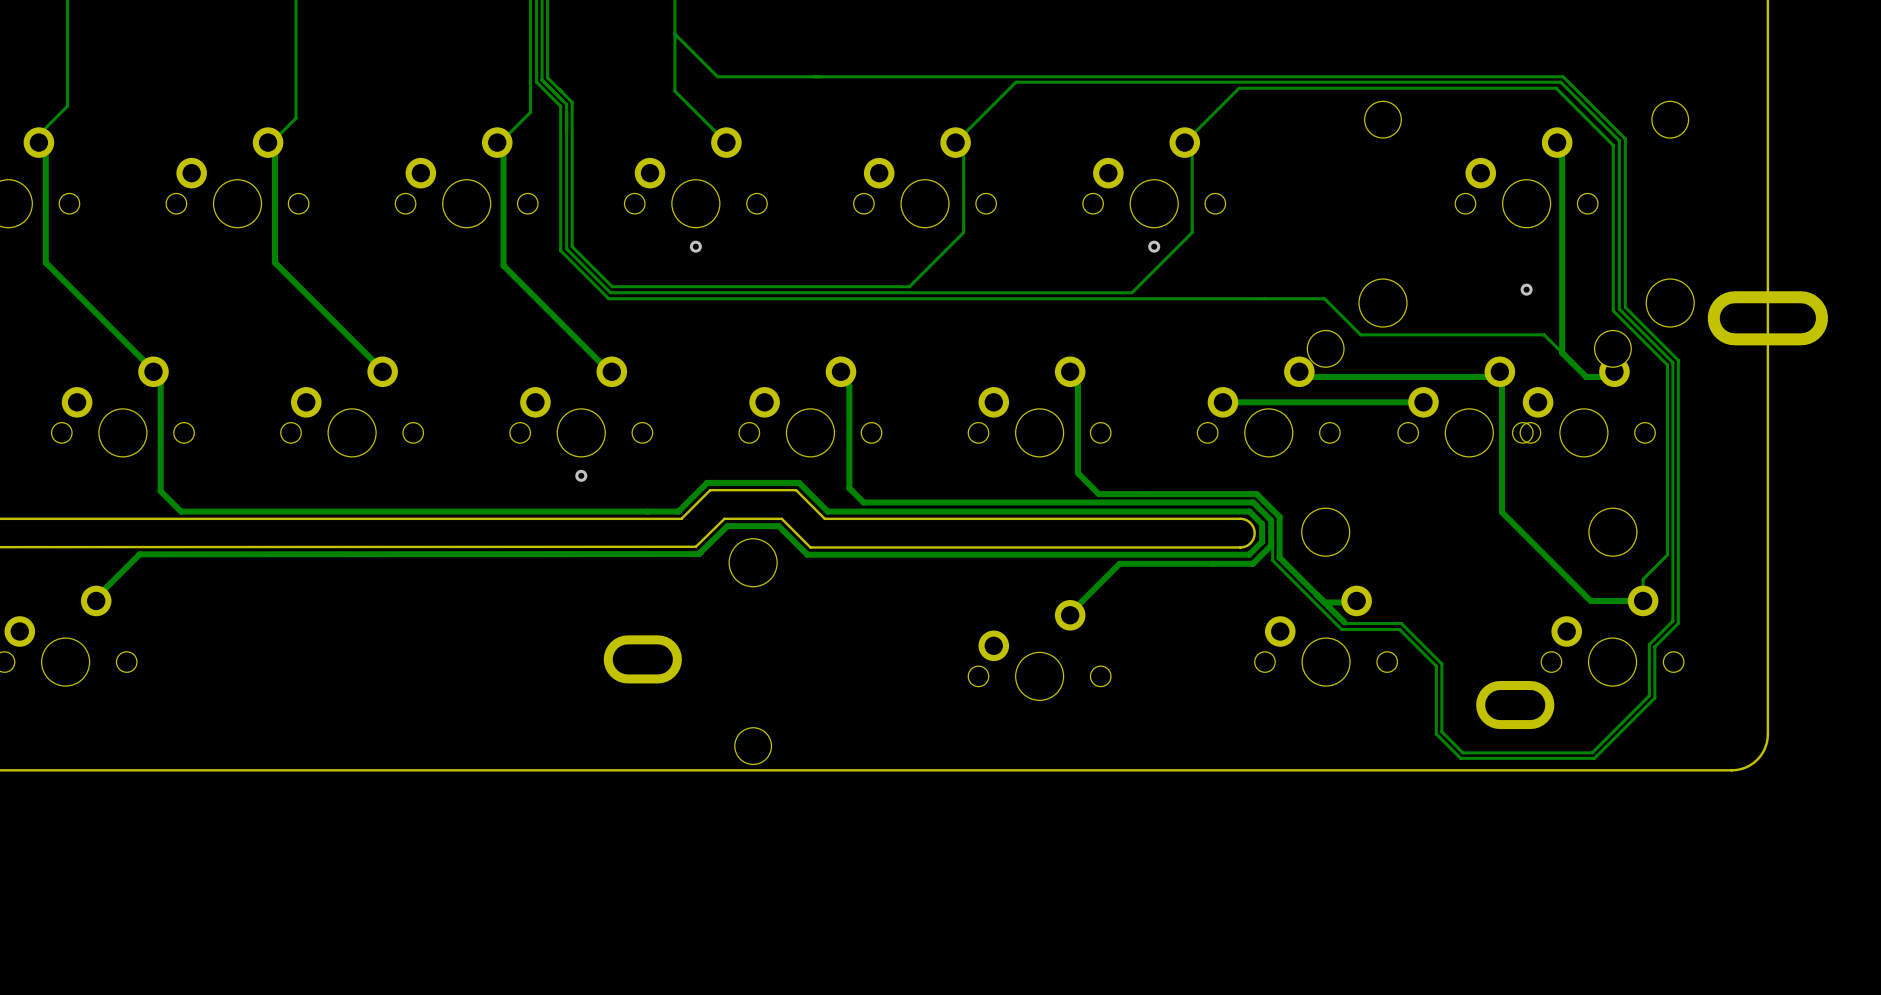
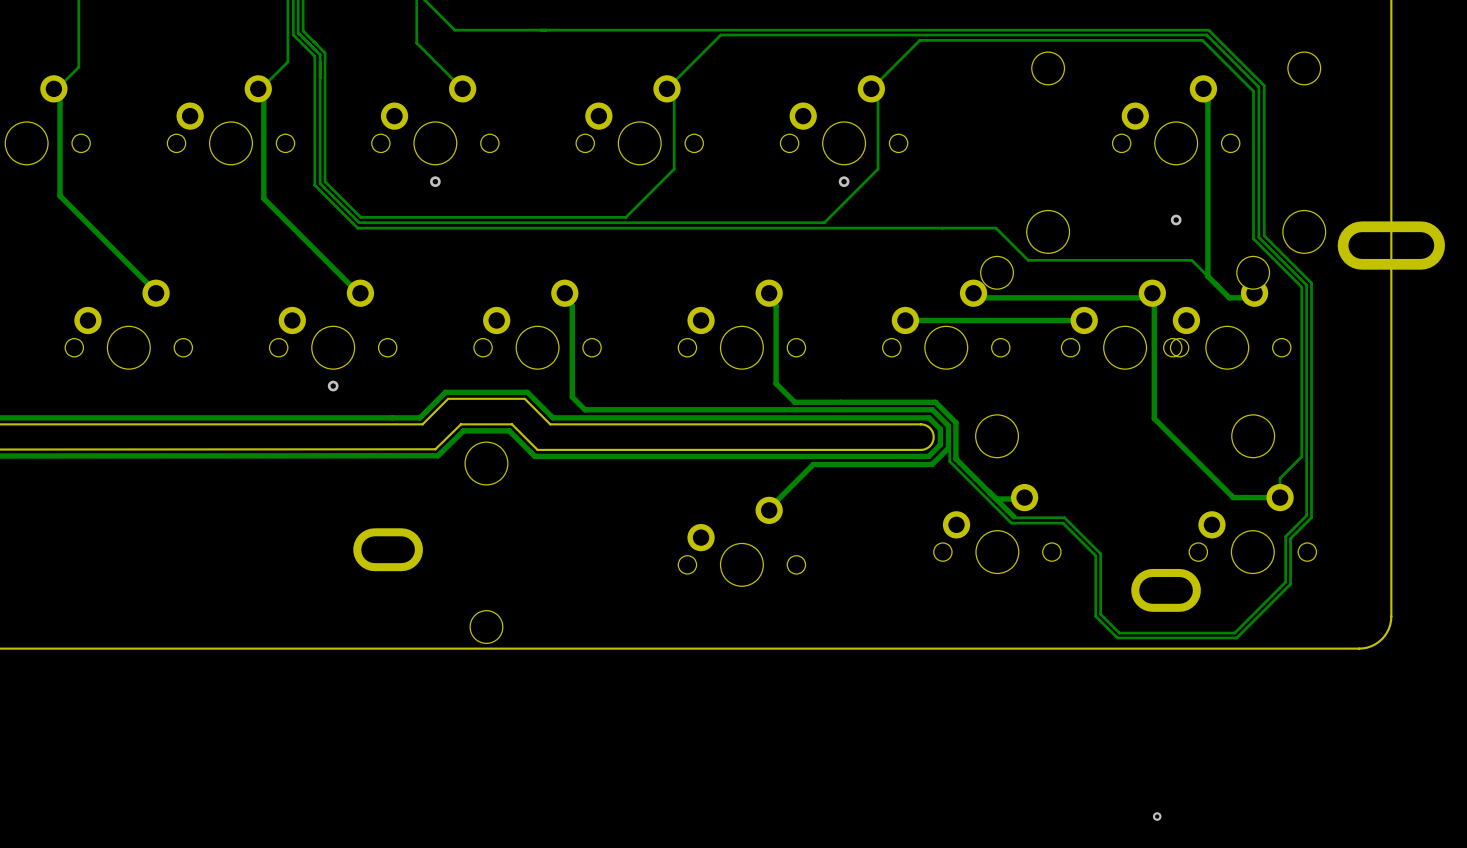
via: none -> (1157, 816)

